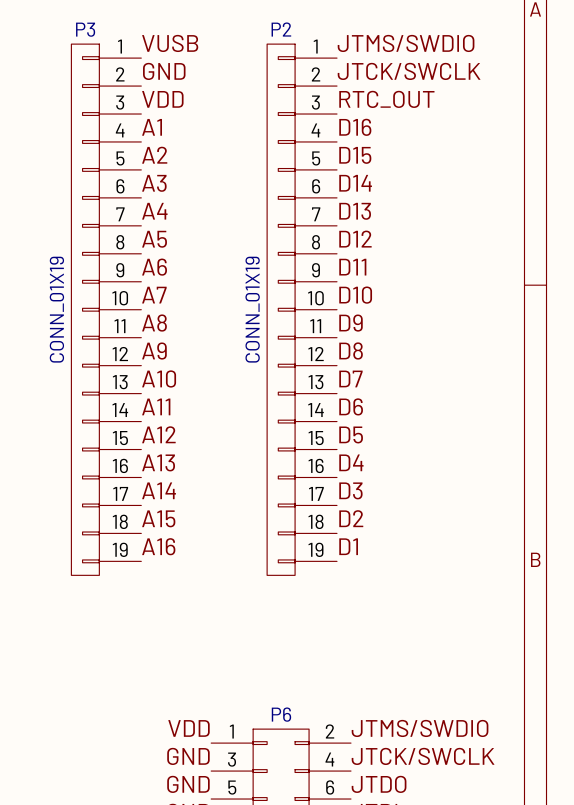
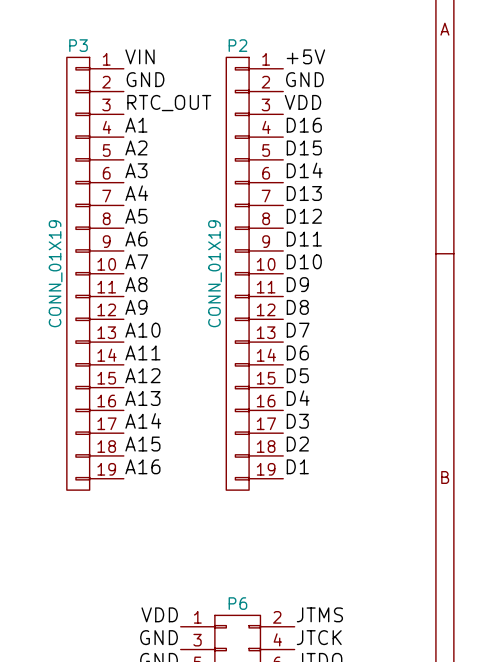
label: VUSB (170, 43) -> VIN (139, 56)
label: JTMS/SWDIO (406, 43) -> +5V (305, 56)
label: JTCK/SWCLK (409, 71) -> GND (304, 79)
label: VDD (162, 99) -> RTC_OUT (169, 103)
label: RTC_OUT (386, 99) -> VDD (302, 102)
label: JTMS/SWDIO (420, 728) -> JTMS (319, 614)
label: JTCK/SWCLK (423, 756) -> JTCK (319, 637)

